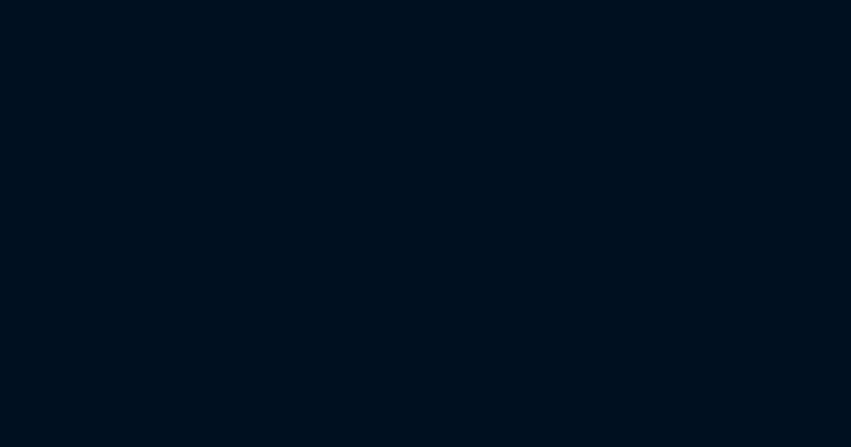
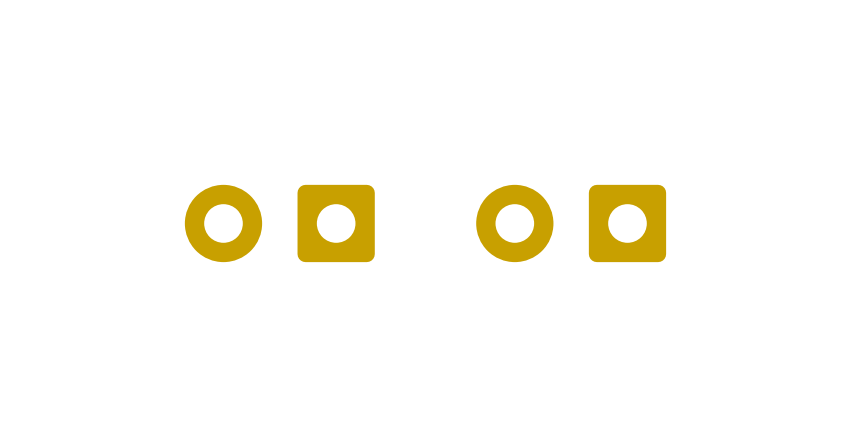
part: none -> (279, 223)
part: none -> (571, 223)

